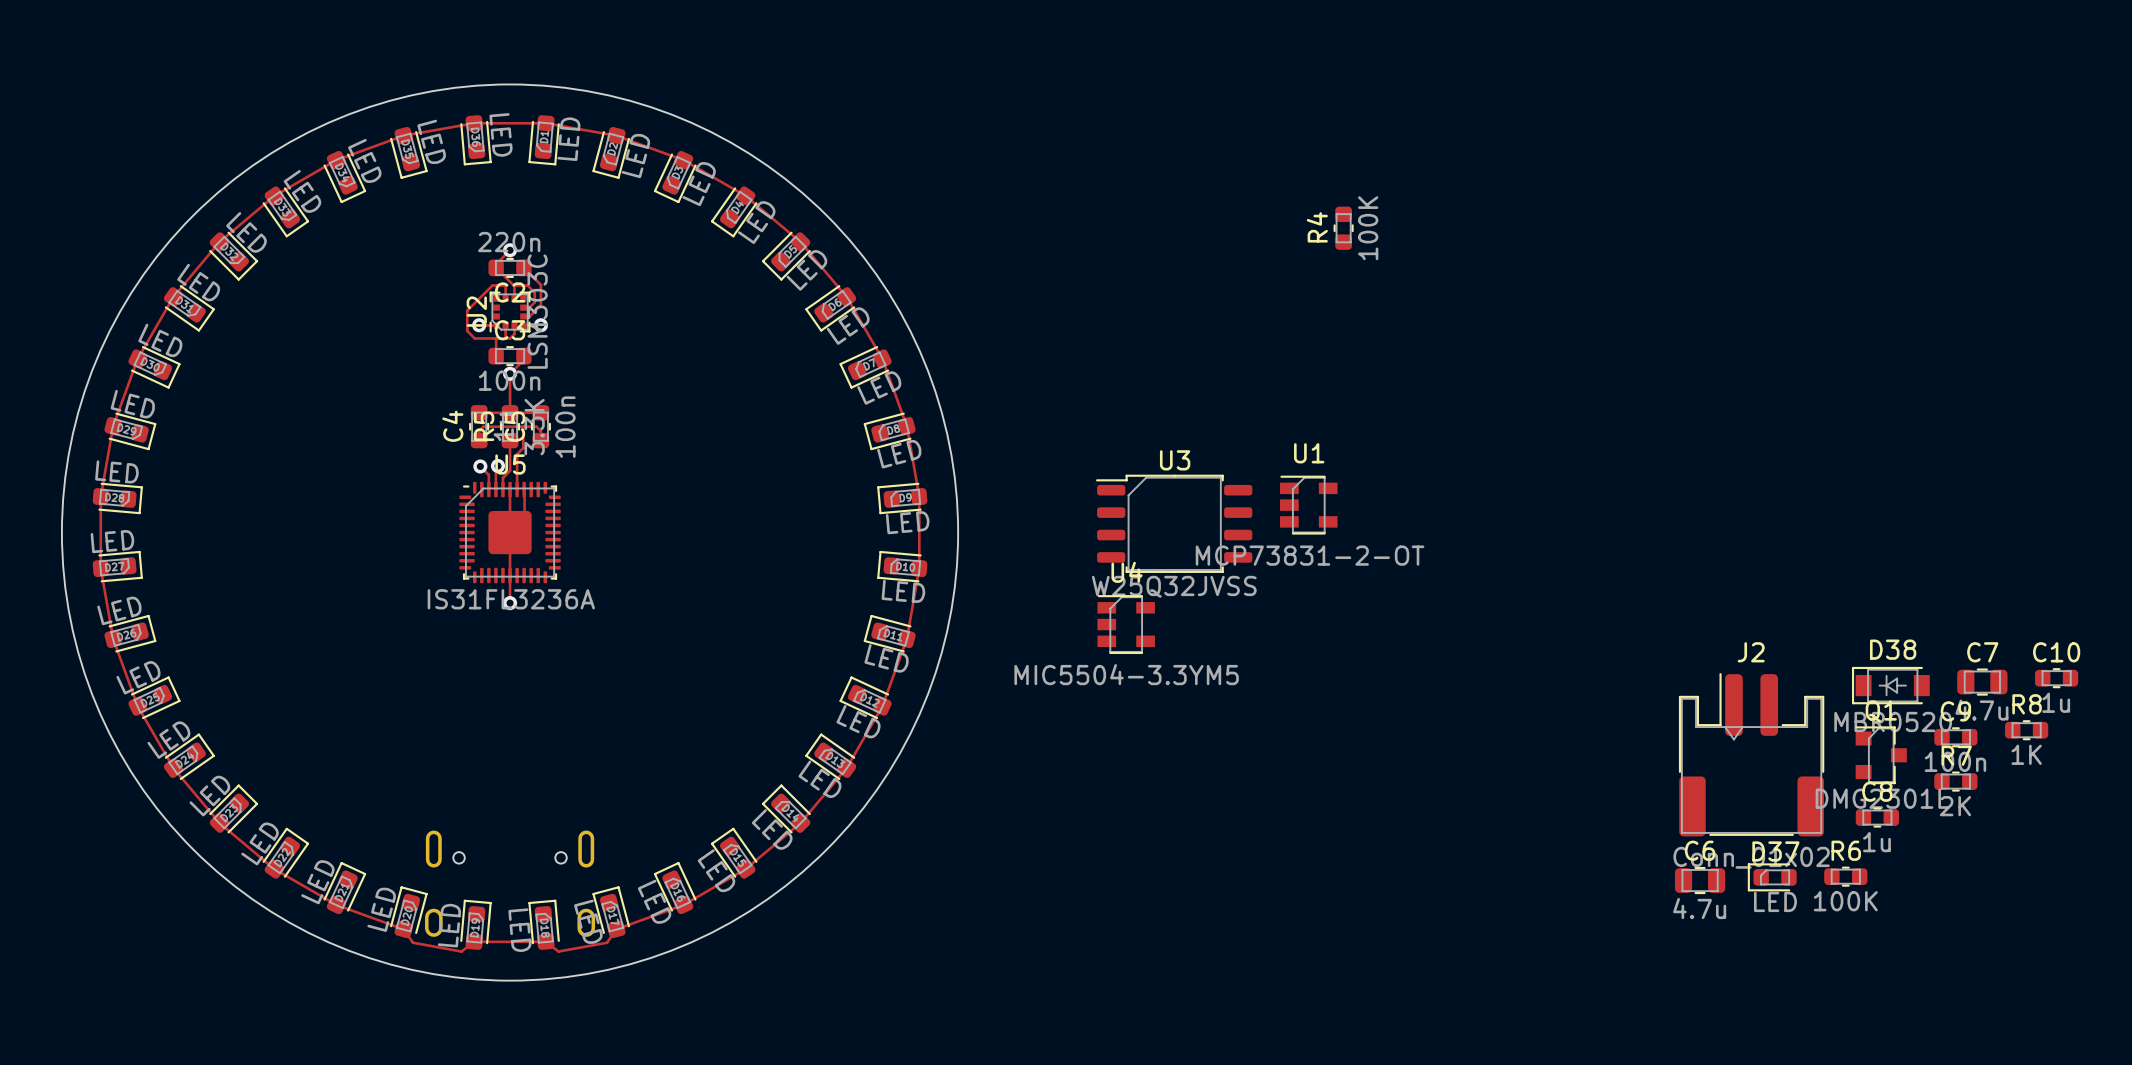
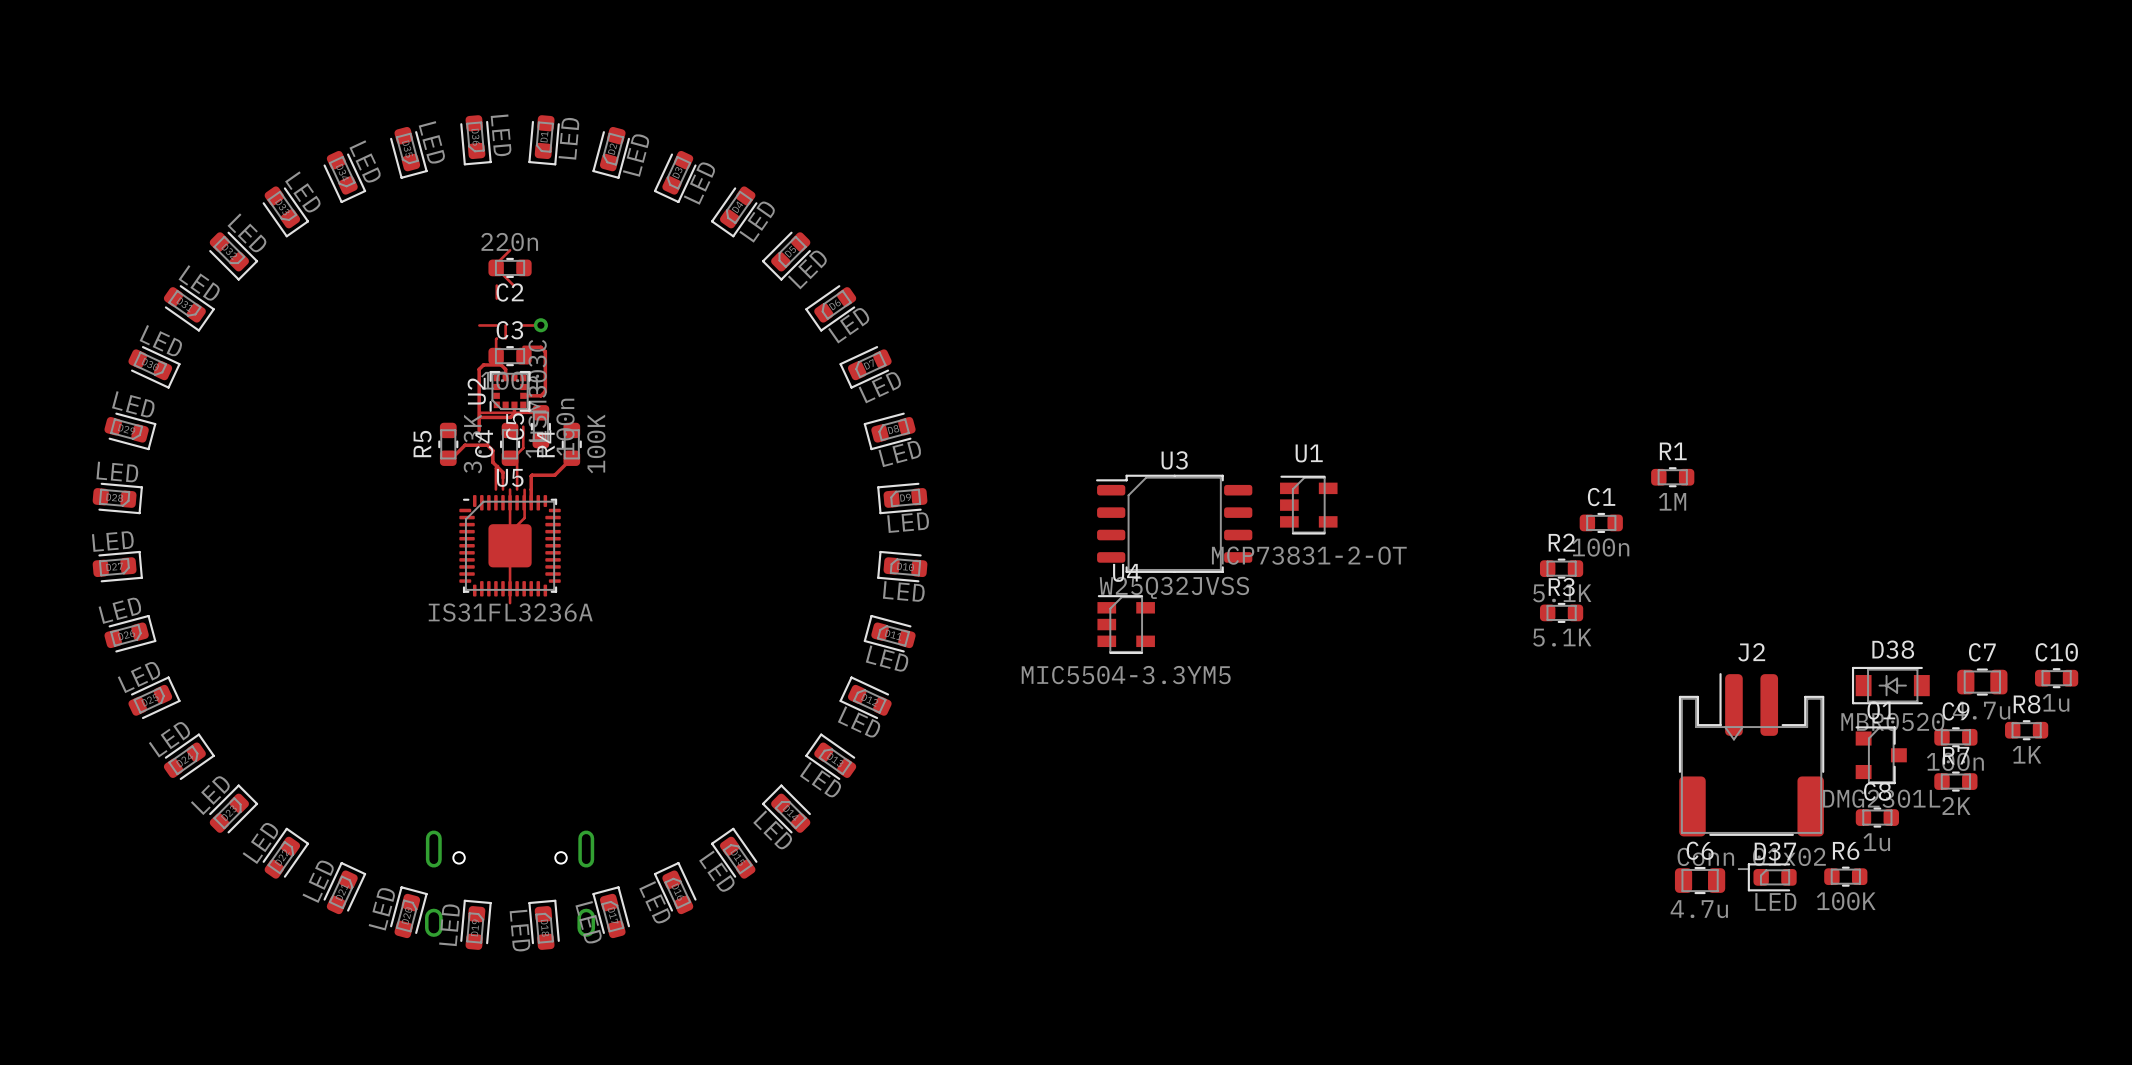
round board edge: [61, 84, 959, 982] -> none
track: (474, 123) (403, 135) (336, 160) (274, 196) (219, 242) (173, 296) (137, 358) (113, 426) (100, 496) (100, 568) (113, 638) (137, 706) (173, 768) (219, 823) (274, 869) (336, 904) (403, 929) (413, 942) (461, 951) (474, 941) (545, 941) (558, 951) (607, 942) (616, 929) (683, 904) (745, 869) (800, 823) (846, 768) (882, 706) (906, 638) (919, 568) (919, 496) (906, 426) (882, 358) (846, 296) (800, 242) (745, 196) (683, 160) (616, 135) (545, 123) (474, 123) -> none
R4 position: (1343, 228) -> (571, 444)
via: (510, 250) -> none
track: (523, 267) (540, 284) (540, 305) (529, 316) (523, 316) -> none
track: (505, 298) (505, 285) (492, 285) (467, 310) (467, 330) (474, 338) (510, 338) (514, 334) (514, 325) -> none
track: (514, 298) (514, 285) (527, 285) (534, 292) (534, 302) (529, 307) (523, 307) -> none
U2 position: (510, 312) -> (510, 391)
via: (479, 325) -> none
track: none -> (523, 347) (540, 347) (545, 351) (545, 391) (540, 395) (523, 395)
track: (523, 356) (523, 359) (510, 373) (510, 412) -> none
via: (510, 373) -> none
track: none -> (505, 377) (505, 369) (501, 364) (483, 364) (479, 369) (479, 430)
track: none -> (514, 404) (514, 413) (510, 417) (479, 417)
C4 position: (479, 426) -> (510, 444)
R5 position: (510, 426) -> (448, 444)
track: (479, 440) (479, 431) (483, 426) (536, 426) (540, 431) (540, 440) -> none
track: (510, 440) (510, 470) (502, 477) -> (448, 458) (452, 458) (465, 445) (487, 445) (492, 450) (492, 462) (502, 472) (502, 477)
track: none -> (571, 458) (554, 475) (531, 476) (531, 502)
track: (480, 466) (488, 474) (488, 489) -> none
via: (480, 466) -> none
via: (497, 466) -> none
R1: none -> 1M (1672, 477)
C1: none -> 100n (1601, 522)
U5 position: (510, 532) -> (510, 545)
R2: none -> 5.1K (1561, 568)
via: (510, 603) -> none
R3: none -> 5.1K (1561, 612)

